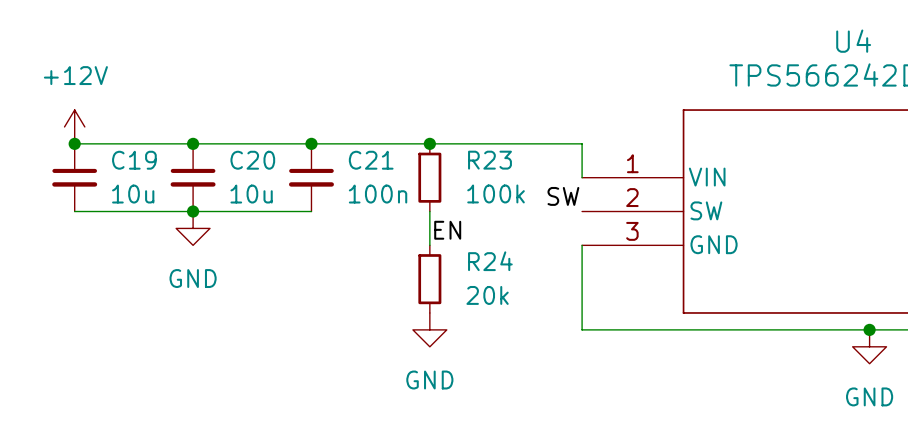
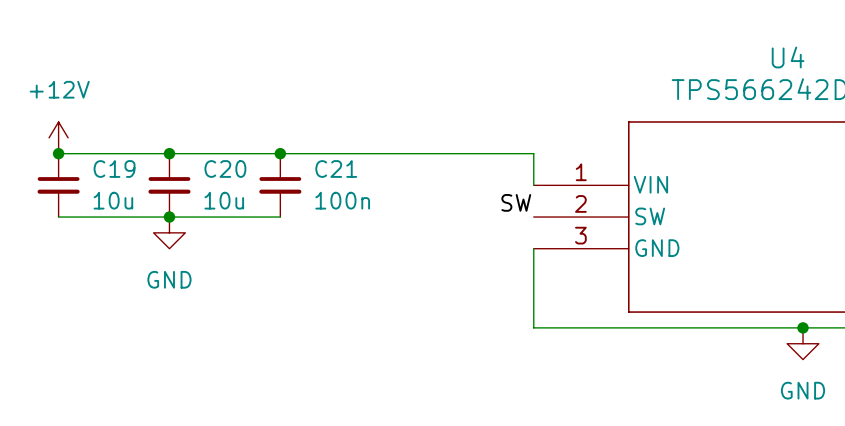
junction: (429, 143) -> none
R23: 100k (429, 177) -> none
wire: (429, 211) (429, 245) -> none
label: EN (447, 230) -> none
R24: 20k (429, 279) -> none
power symbol: GND (429, 329) -> none

